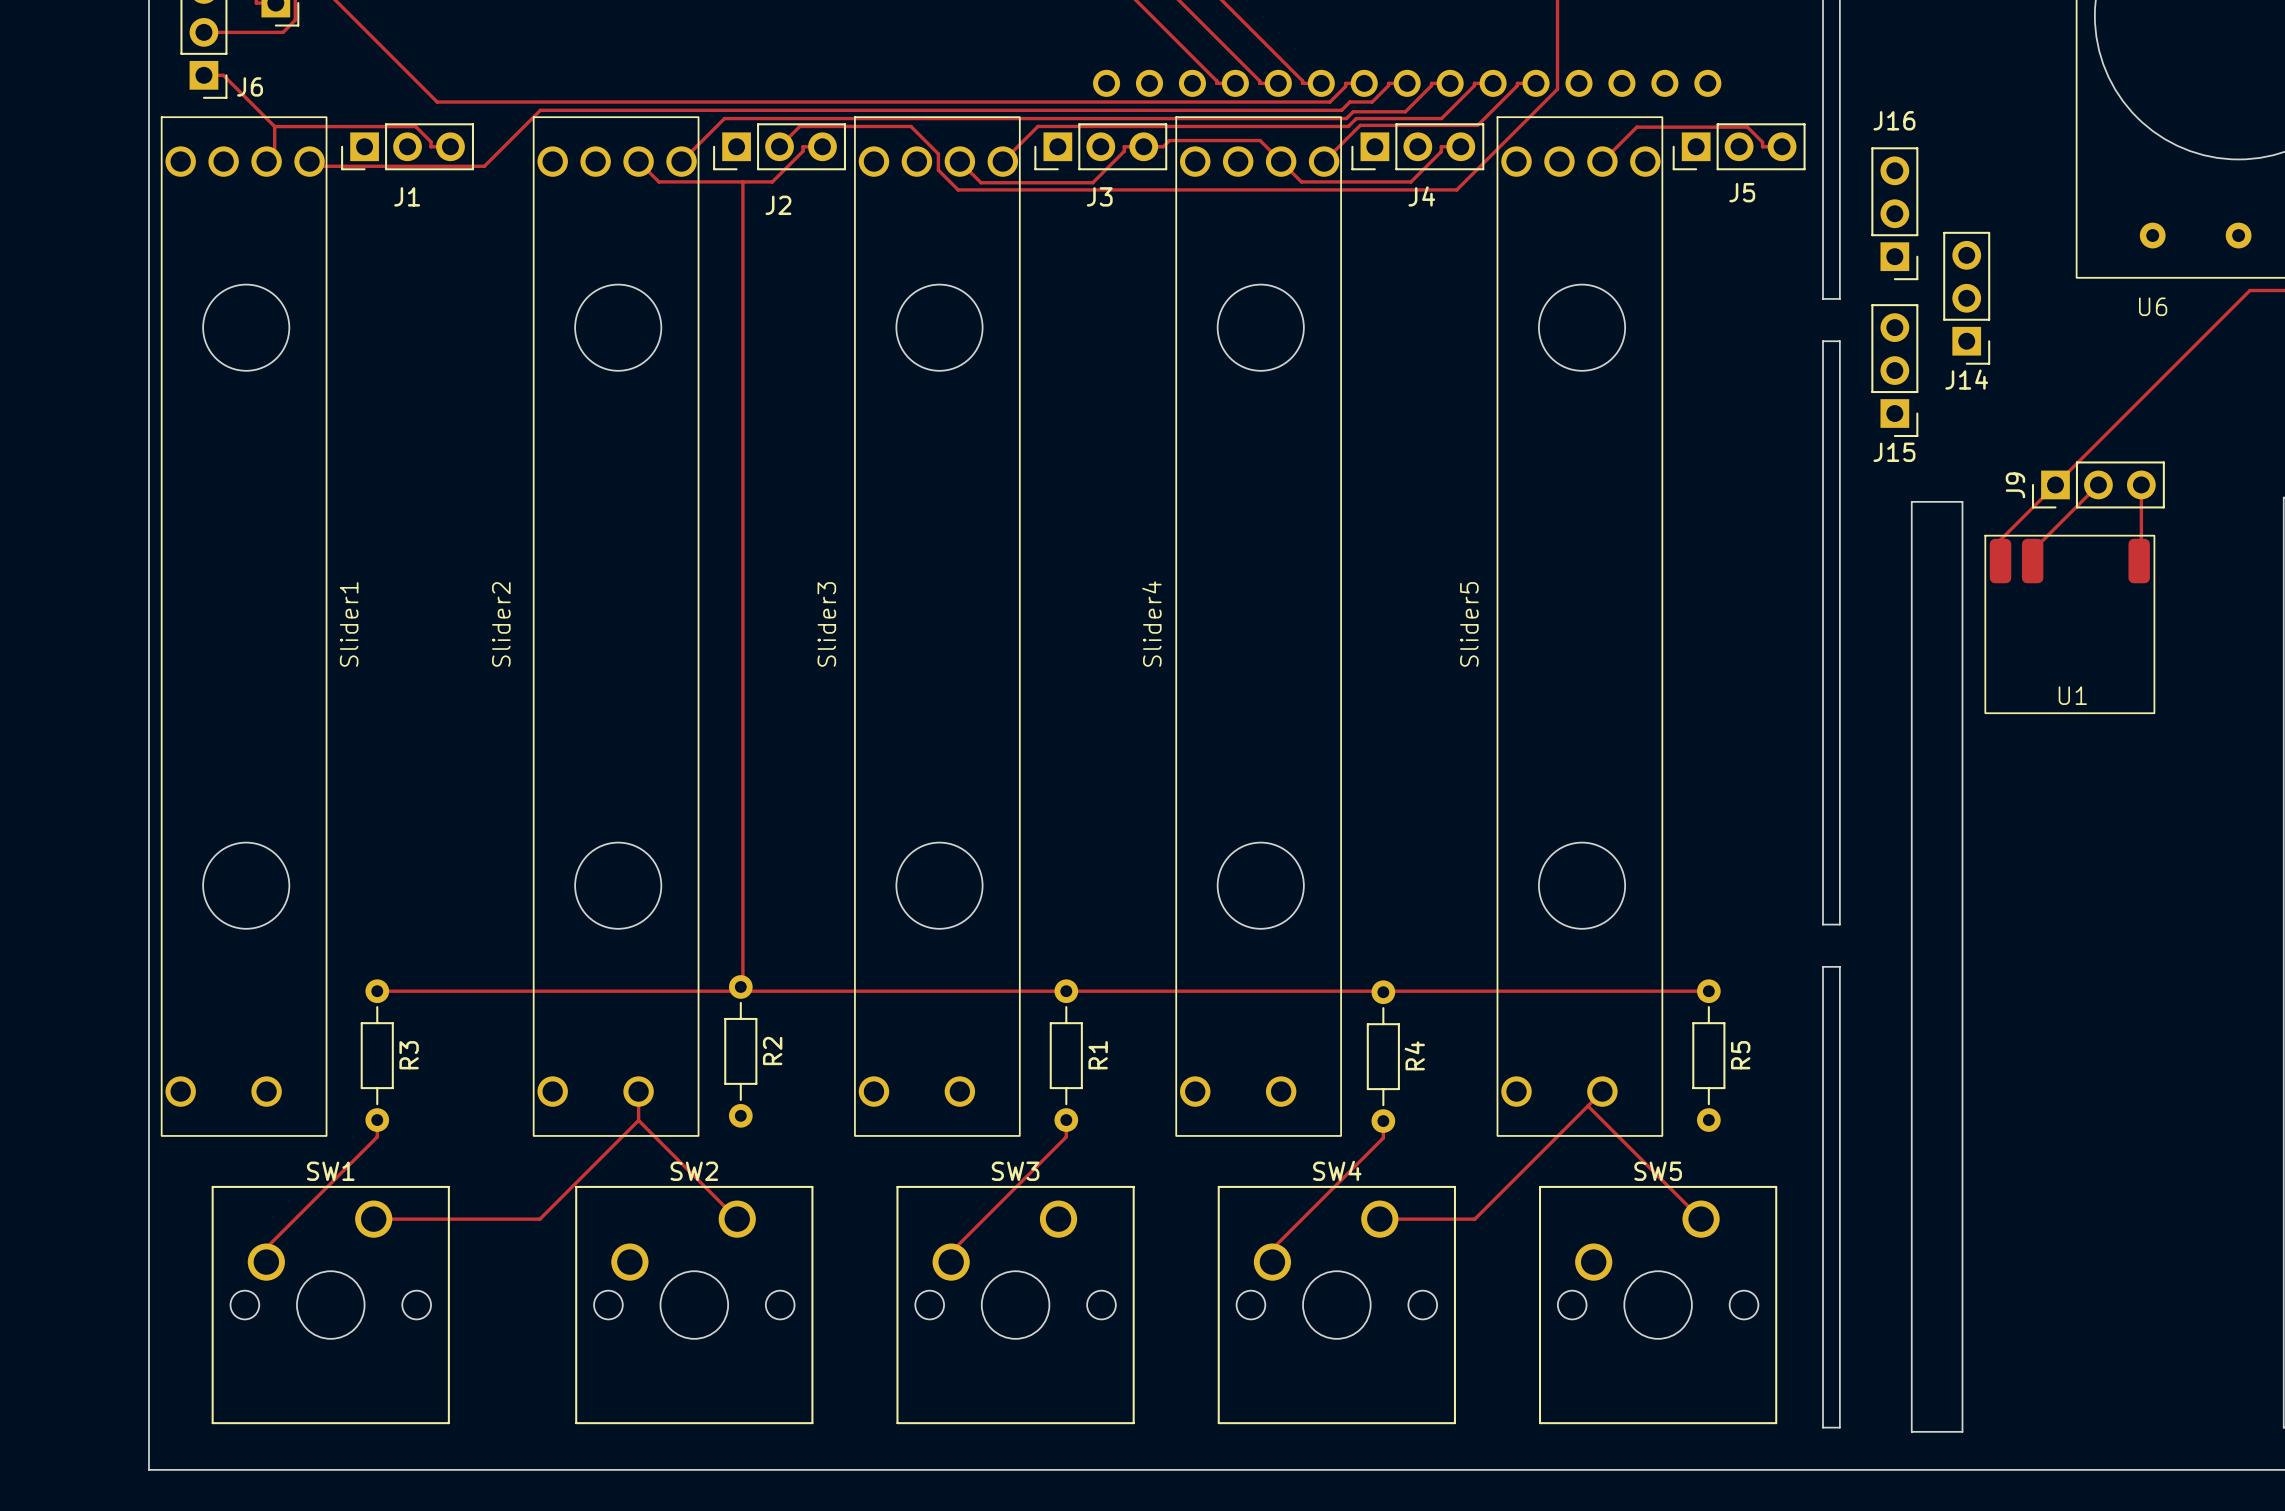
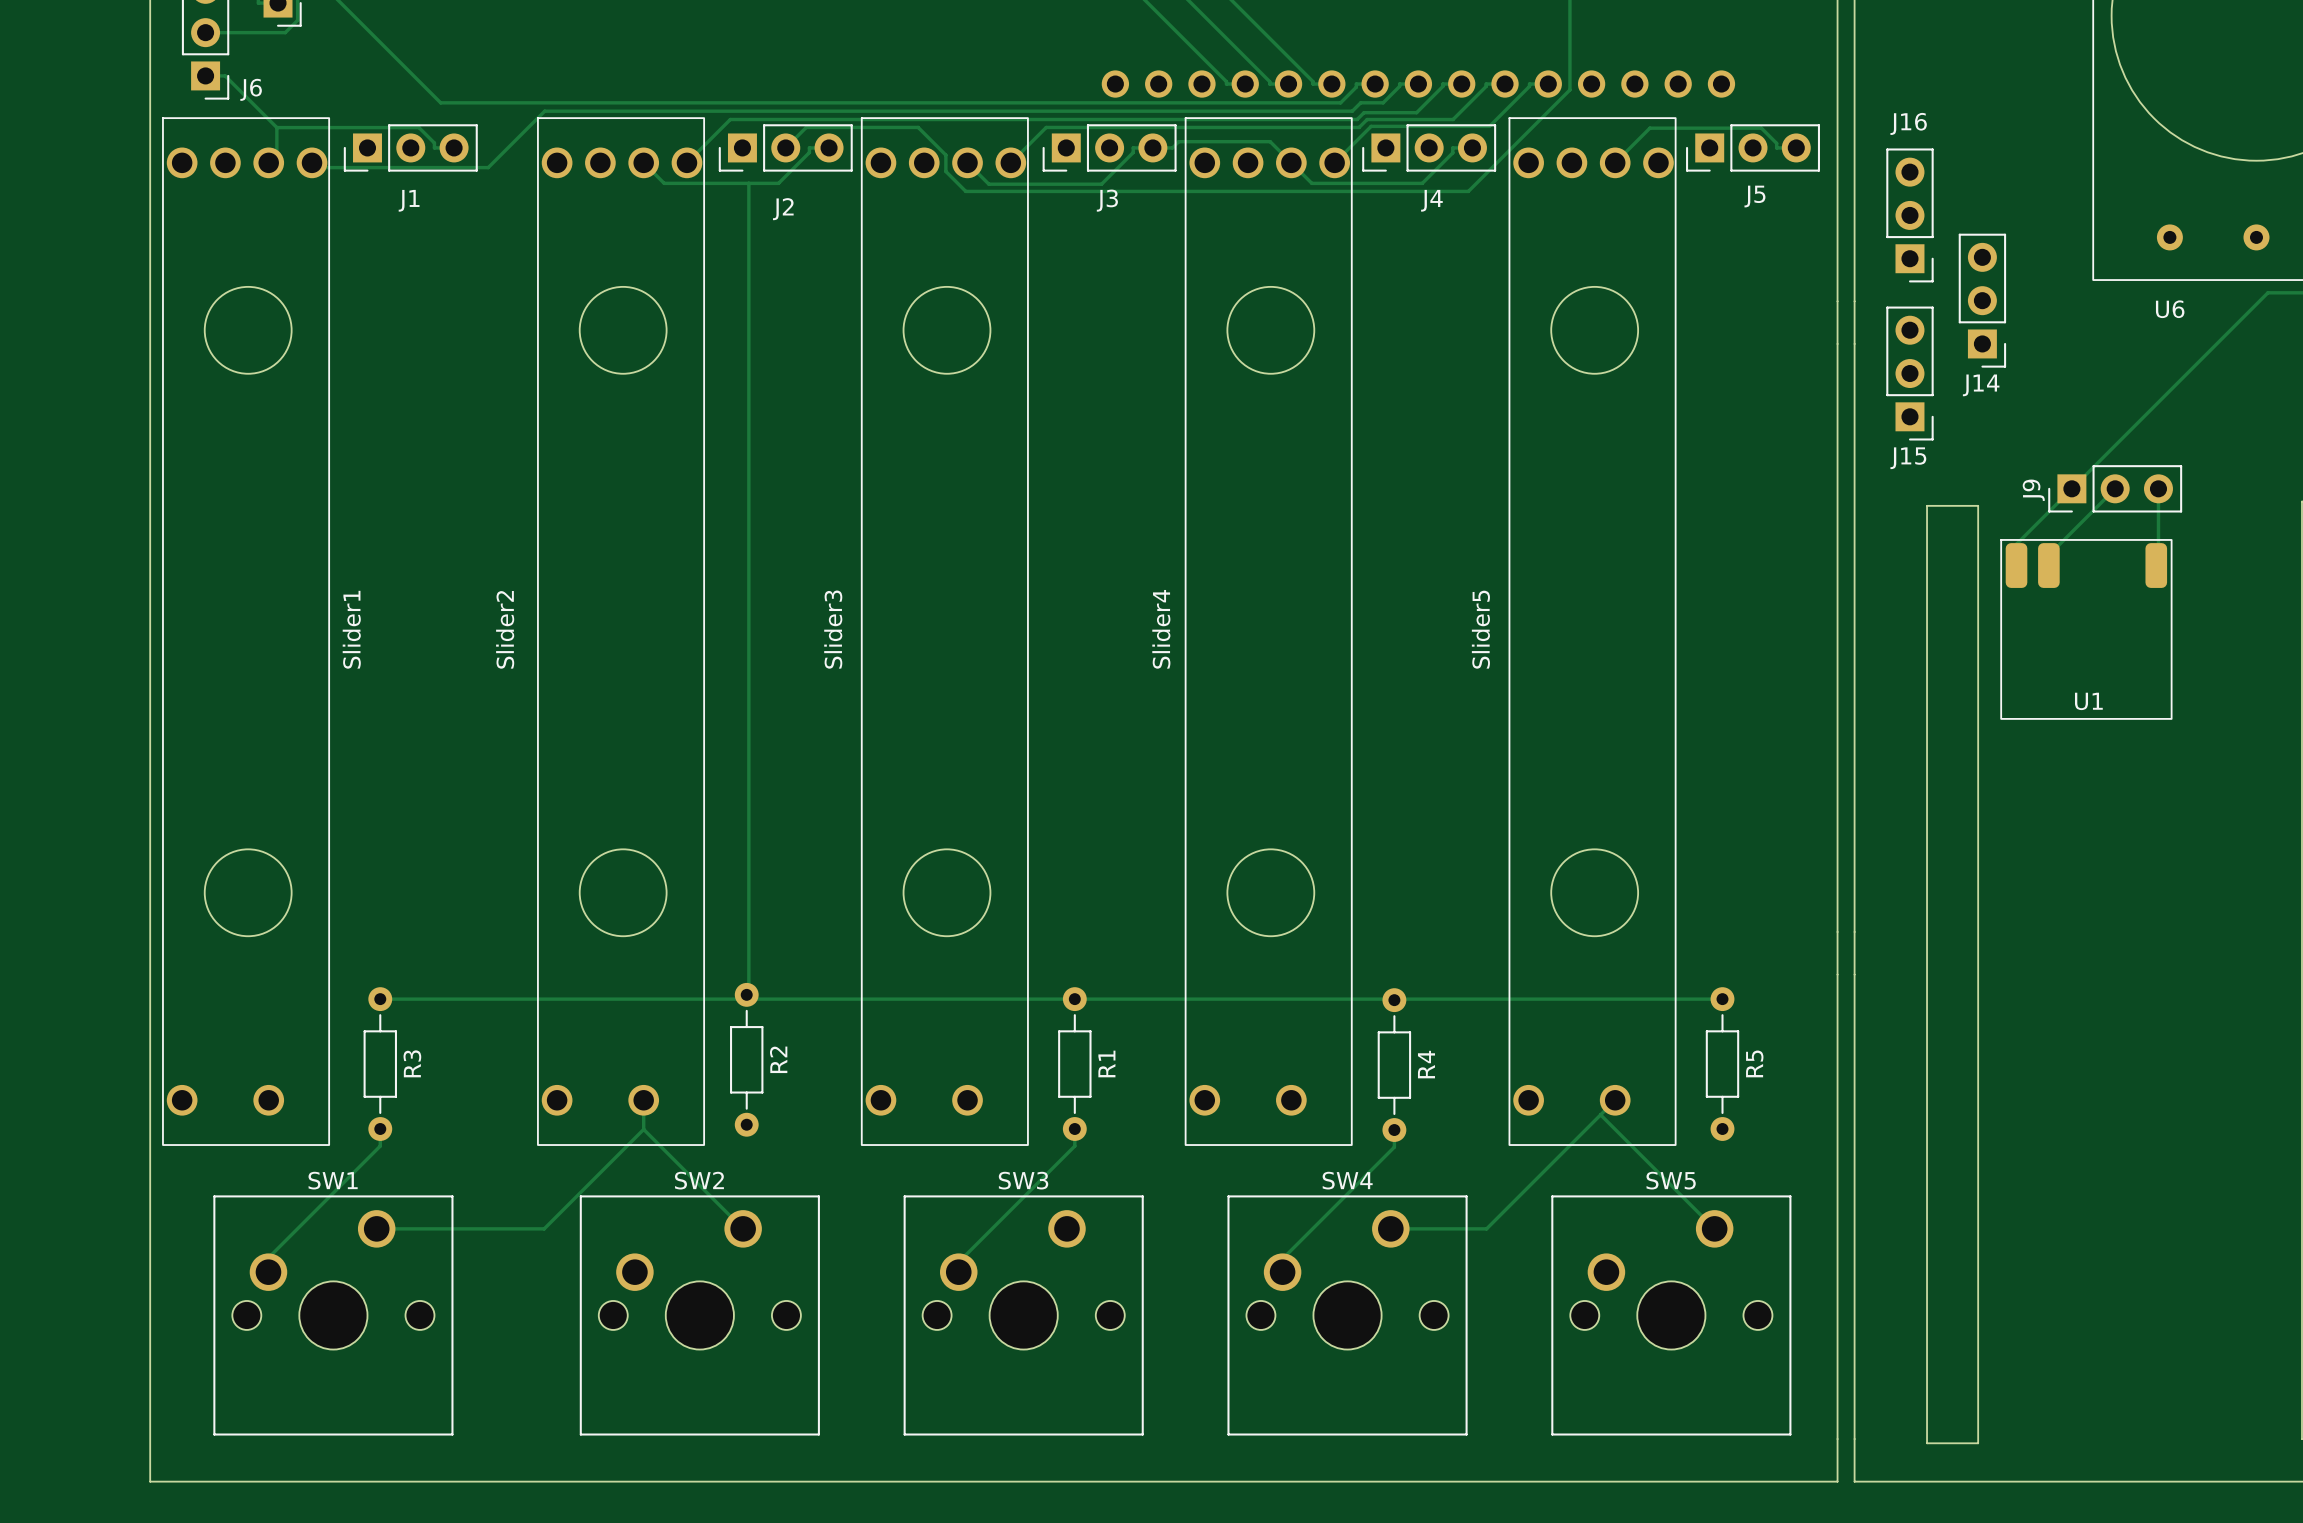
board edge: (1822, 298) (1839, 298) -> (1837, 301) (1837, 343)
board edge: (1822, 341) (1839, 341) -> (1854, 301) (1854, 343)
board edge: (1822, 924) (1839, 924) -> (1837, 931) (1837, 974)
board edge: (1822, 966) (1839, 966) -> (1854, 931) (1854, 974)
board edge: (1822, 1427) (1839, 1427) -> (1837, 1439) (1837, 1481)
board edge: (1822, 1469) (1839, 1469) -> (1854, 1439) (1854, 1481)

